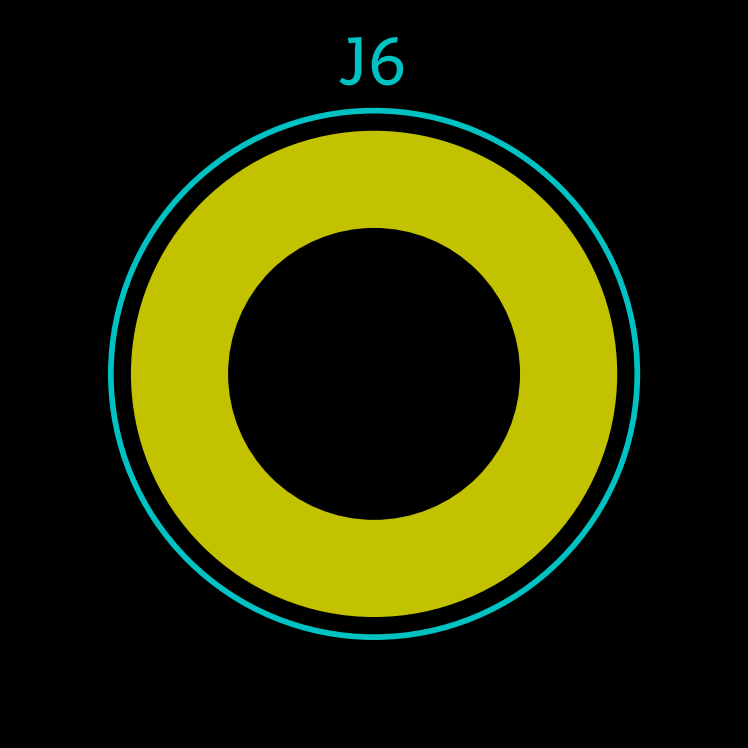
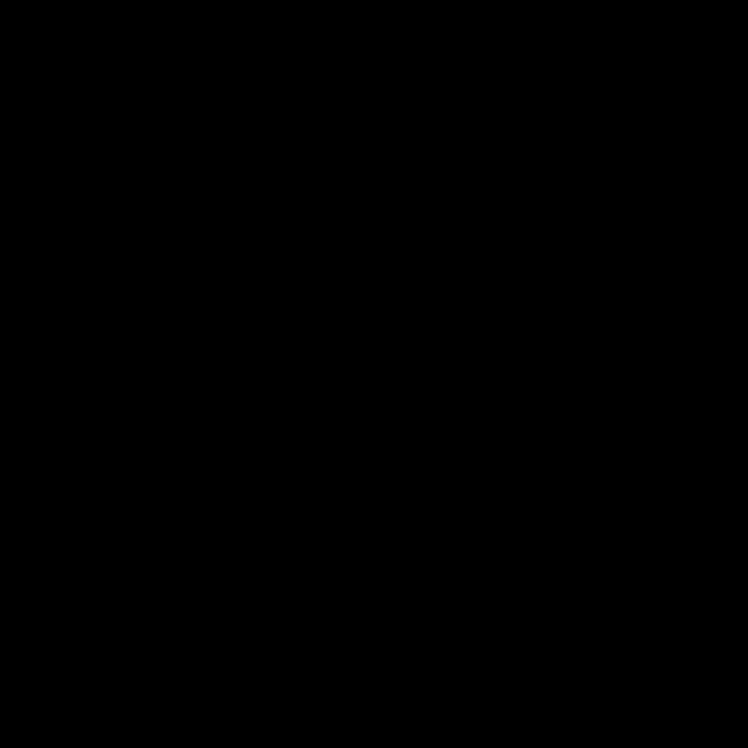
J6: (374, 373) -> none

